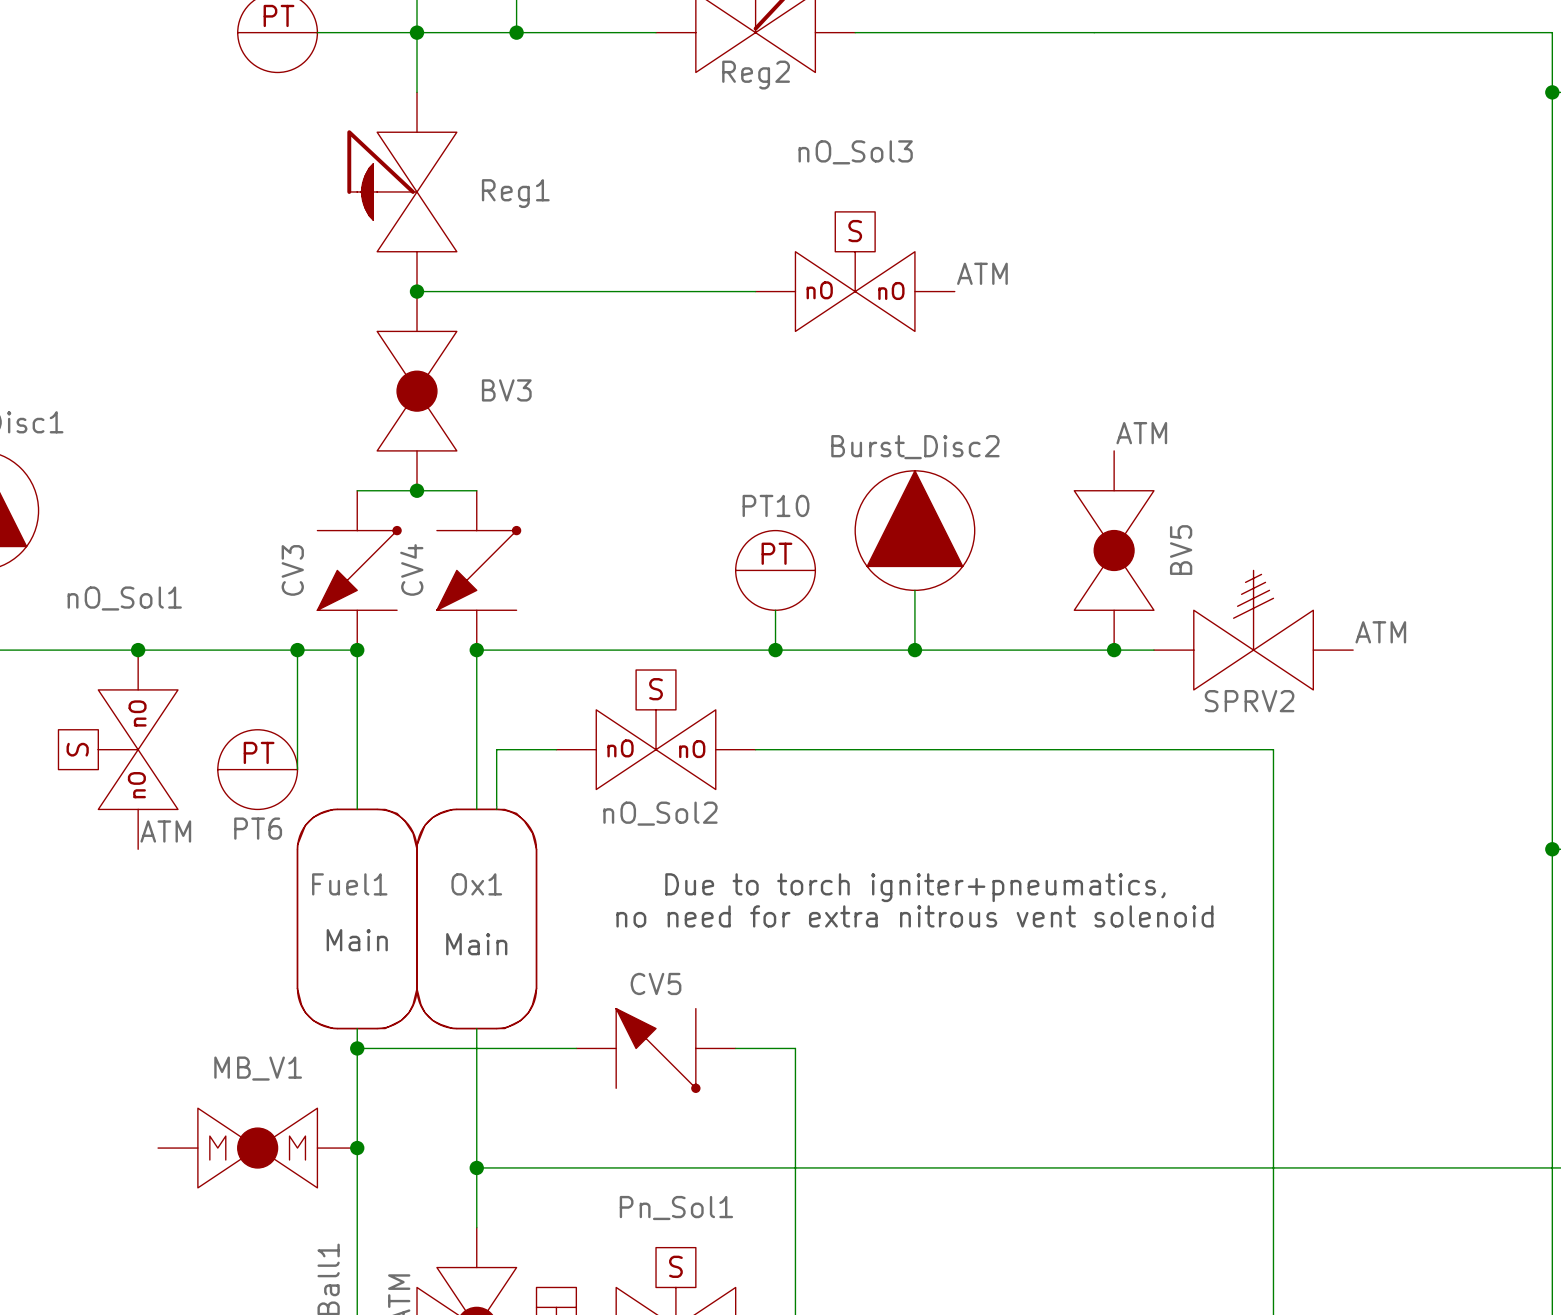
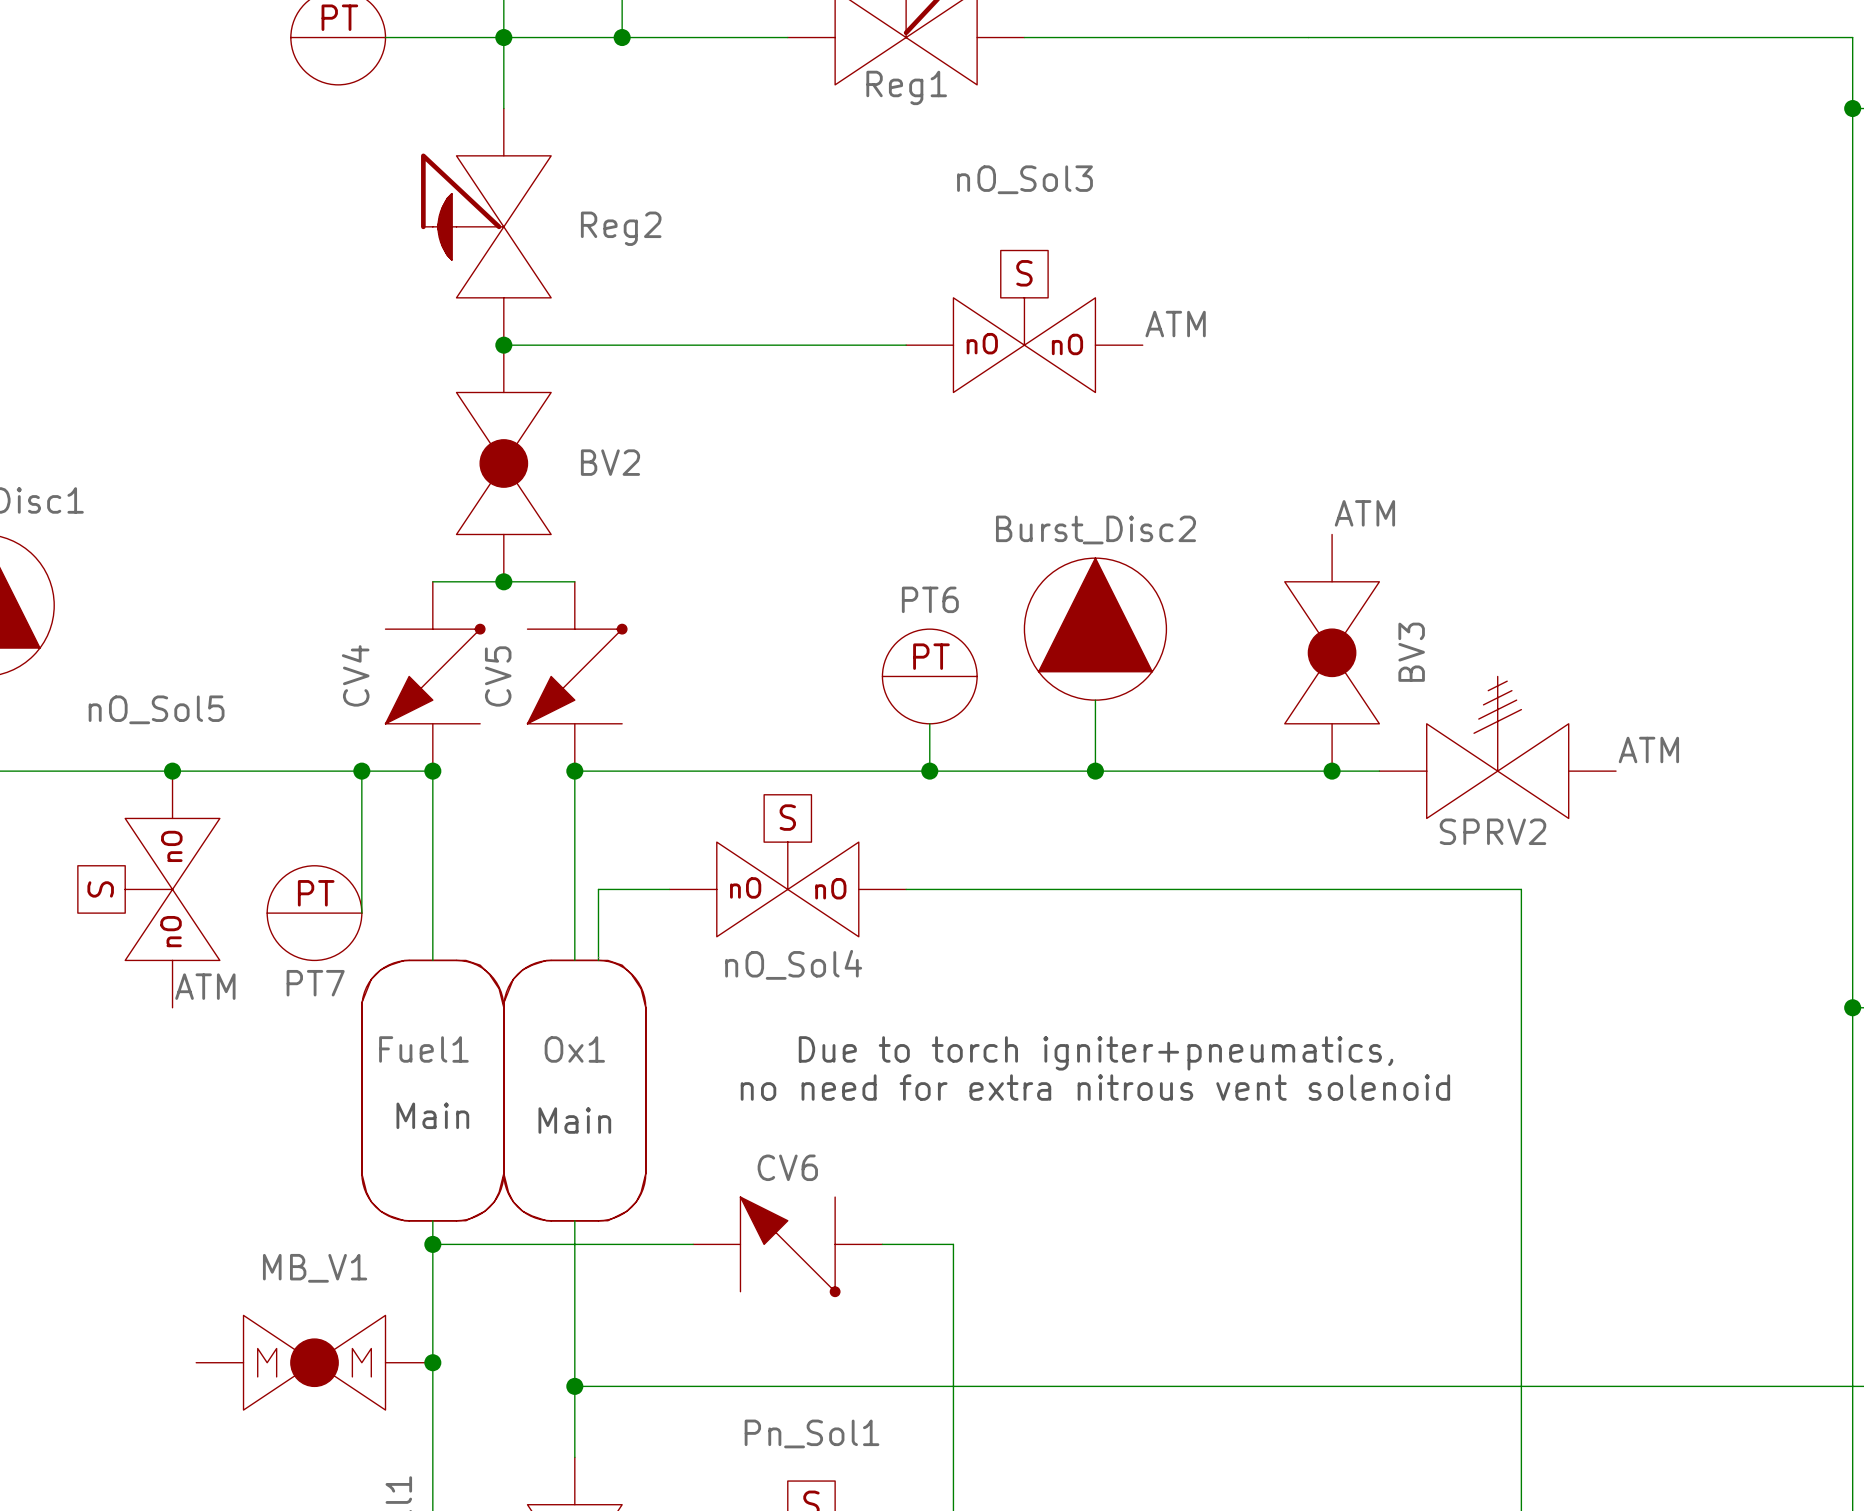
Reg2 name: Reg2 (756, 75) -> Reg1 (906, 87)
Reg1 name: Reg1 (515, 193) -> Reg2 (621, 228)
BV3 name: BV3 (506, 390) -> BV2 (610, 462)
PT10 name: PT10 (775, 505) -> PT6 (930, 599)
BV5 name: BV5 (1181, 550) -> BV3 (1411, 652)
CV4 name: CV4 (411, 569) -> CV5 (498, 676)
CV3 name: CV3 (292, 570) -> CV4 (355, 675)
nO_Sol1 name: nO_Sol1 (124, 598) -> nO_Sol5 (156, 709)
nO_Sol2 name: nO_Sol2 (660, 813) -> nO_Sol4 (793, 964)
PT6 name: PT6 (258, 828) -> PT7 (315, 983)
CV5 name: CV5 (656, 983) -> CV6 (787, 1167)

